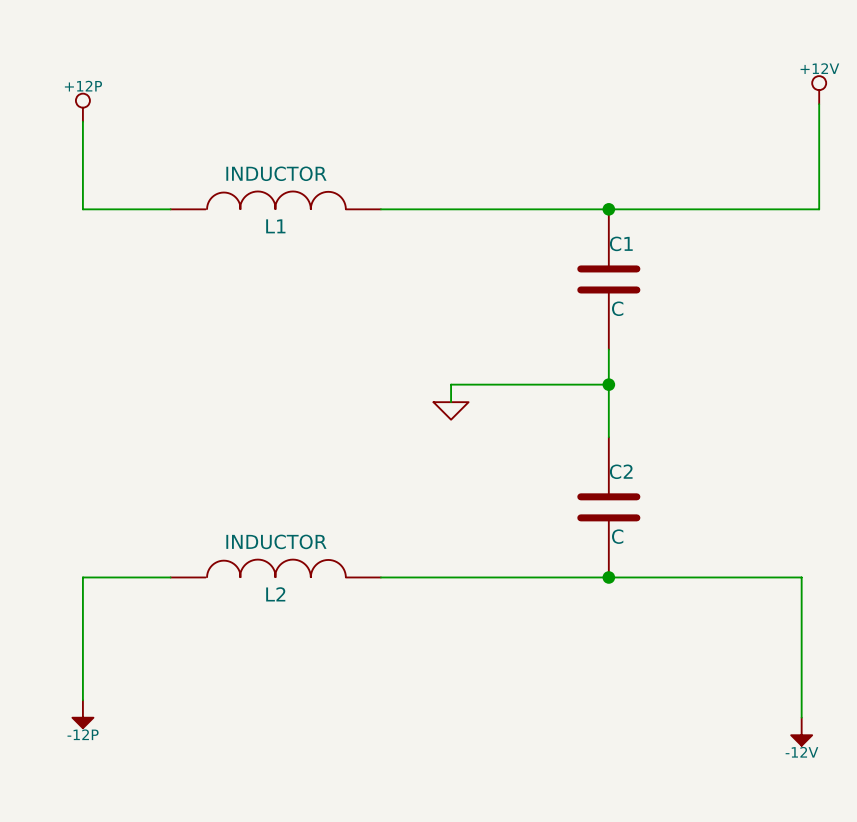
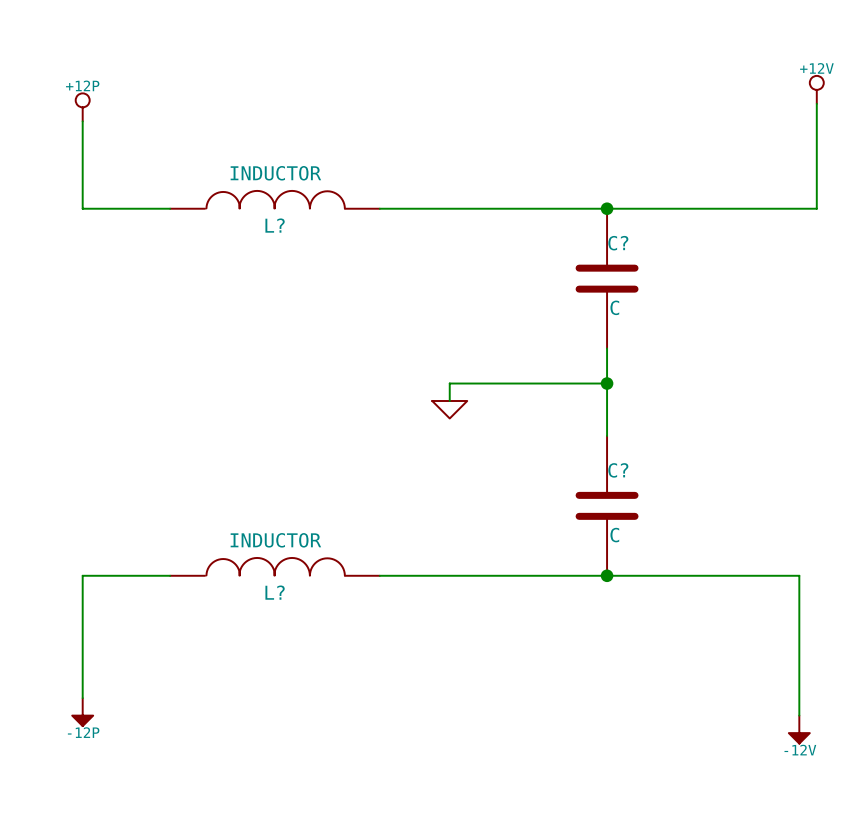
L1 name: L1 (275, 226) -> L? (275, 225)
C1 name: C1 (621, 243) -> C? (618, 243)
C2 name: C2 (621, 471) -> C? (618, 470)
L2 name: L2 (275, 594) -> L? (275, 592)

